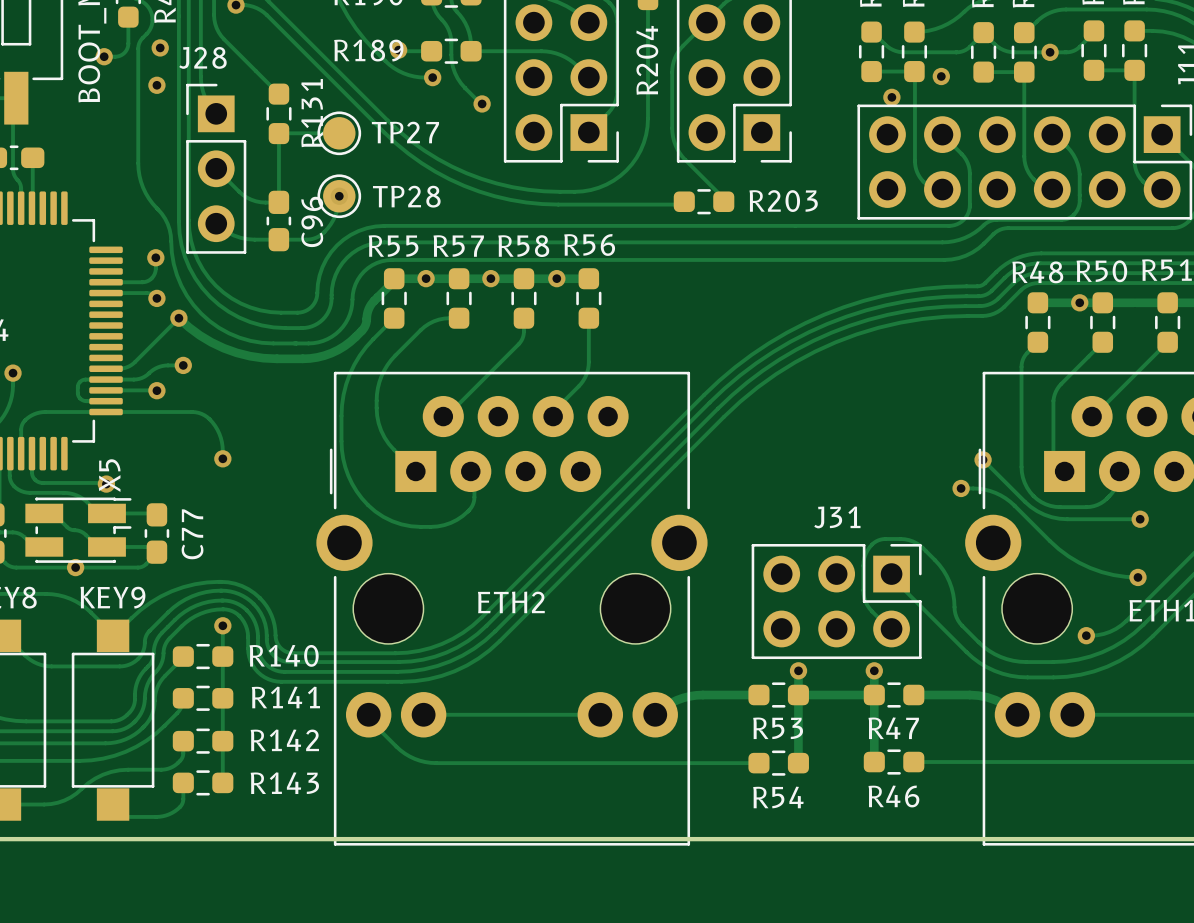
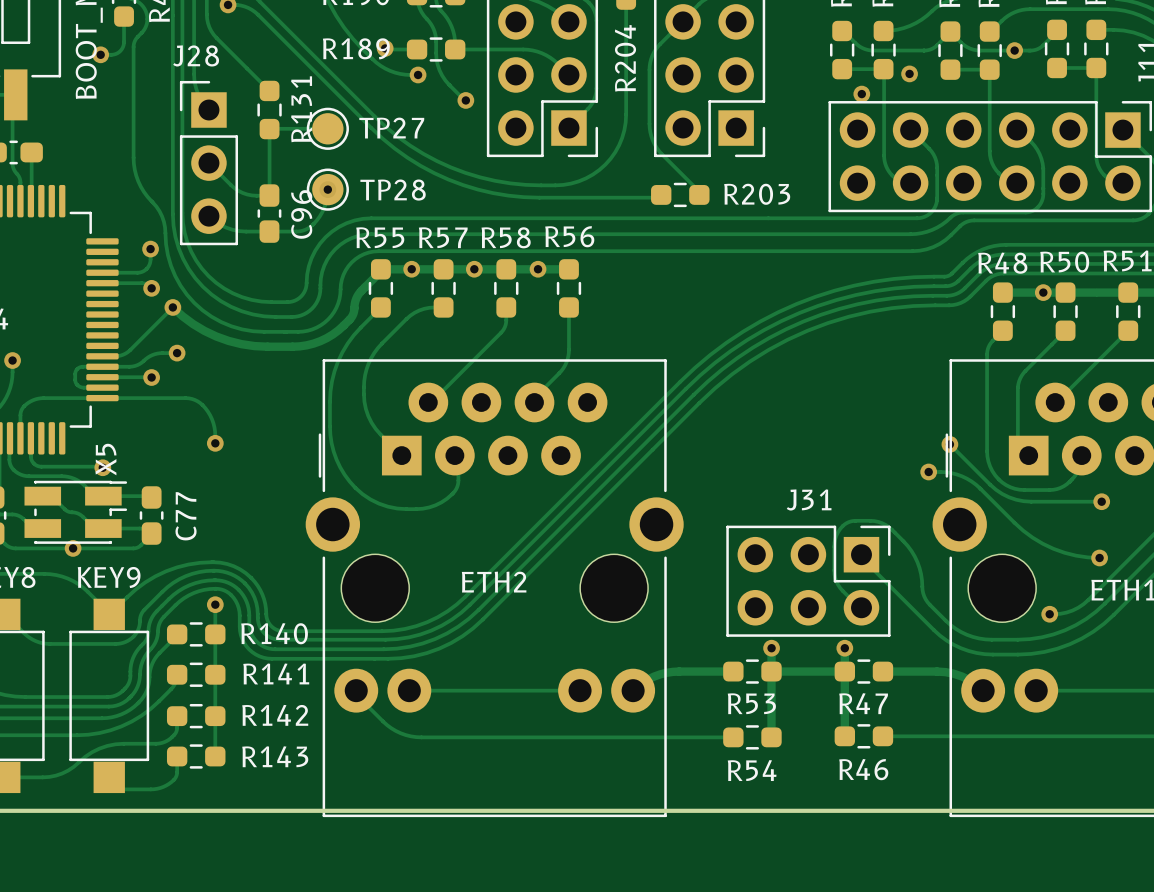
via: (160, 47) -> none
via: (156, 85) -> none

